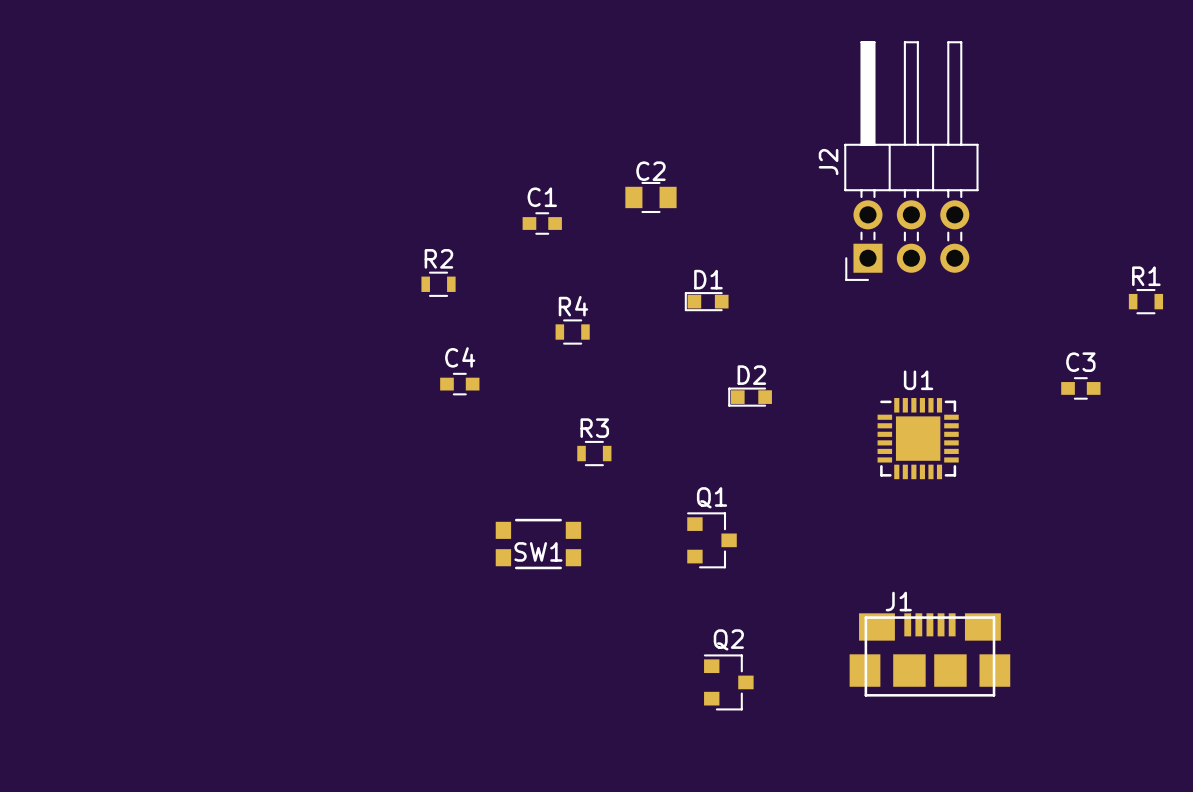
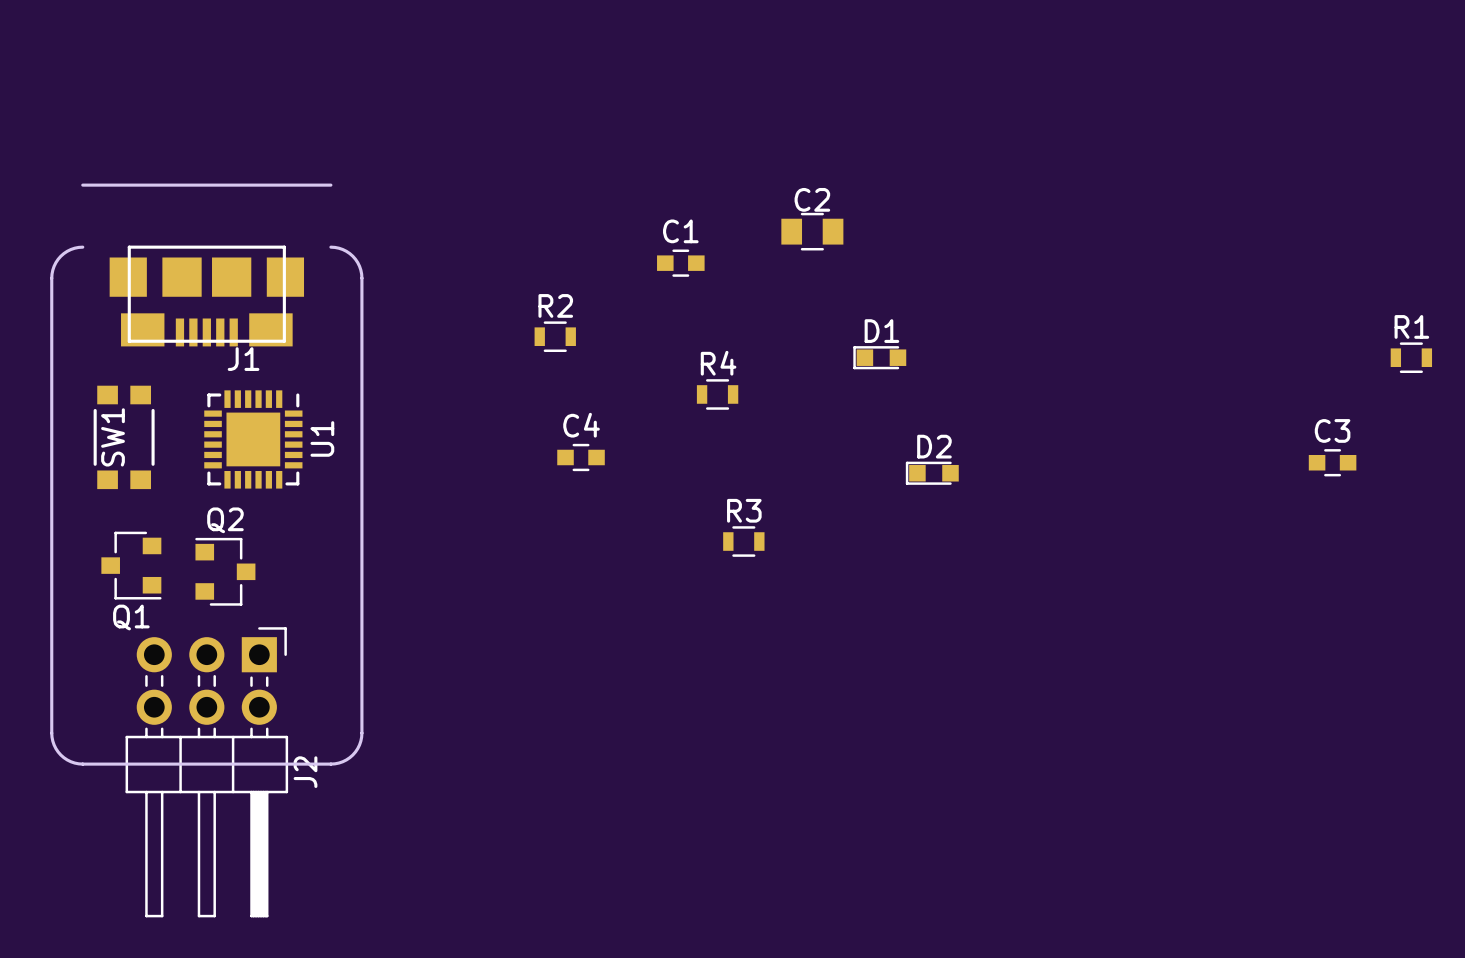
board edge: none -> (82, 185) (330, 185)
J2 rotation: 0° (911, 161) -> 180° (206, 772)
J2 position: (911, 161) -> (206, 772)
board edge: none -> (82, 247) (70, 249) (60, 256) (54, 266) (51, 278) (51, 733) (54, 744) (60, 755) (70, 761) (82, 764) (334, 763) (349, 757) (359, 744) (361, 733) (361, 278) (359, 266) (352, 256) (342, 249) (330, 247)
U1 rotation: 0° (918, 438) -> 90° clockwise (253, 439)
U1 position: (918, 438) -> (253, 439)
Q1 rotation: 0° (711, 540) -> 180° (131, 565)
Q1 position: (711, 540) -> (131, 565)
SW1 rotation: 0° (538, 544) -> 90° clockwise (124, 437)
SW1 position: (538, 544) -> (124, 437)
J1 rotation: 0° (929, 654) -> 180° (206, 296)
J1 position: (929, 654) -> (206, 296)
Q2 position: (728, 682) -> (225, 571)

